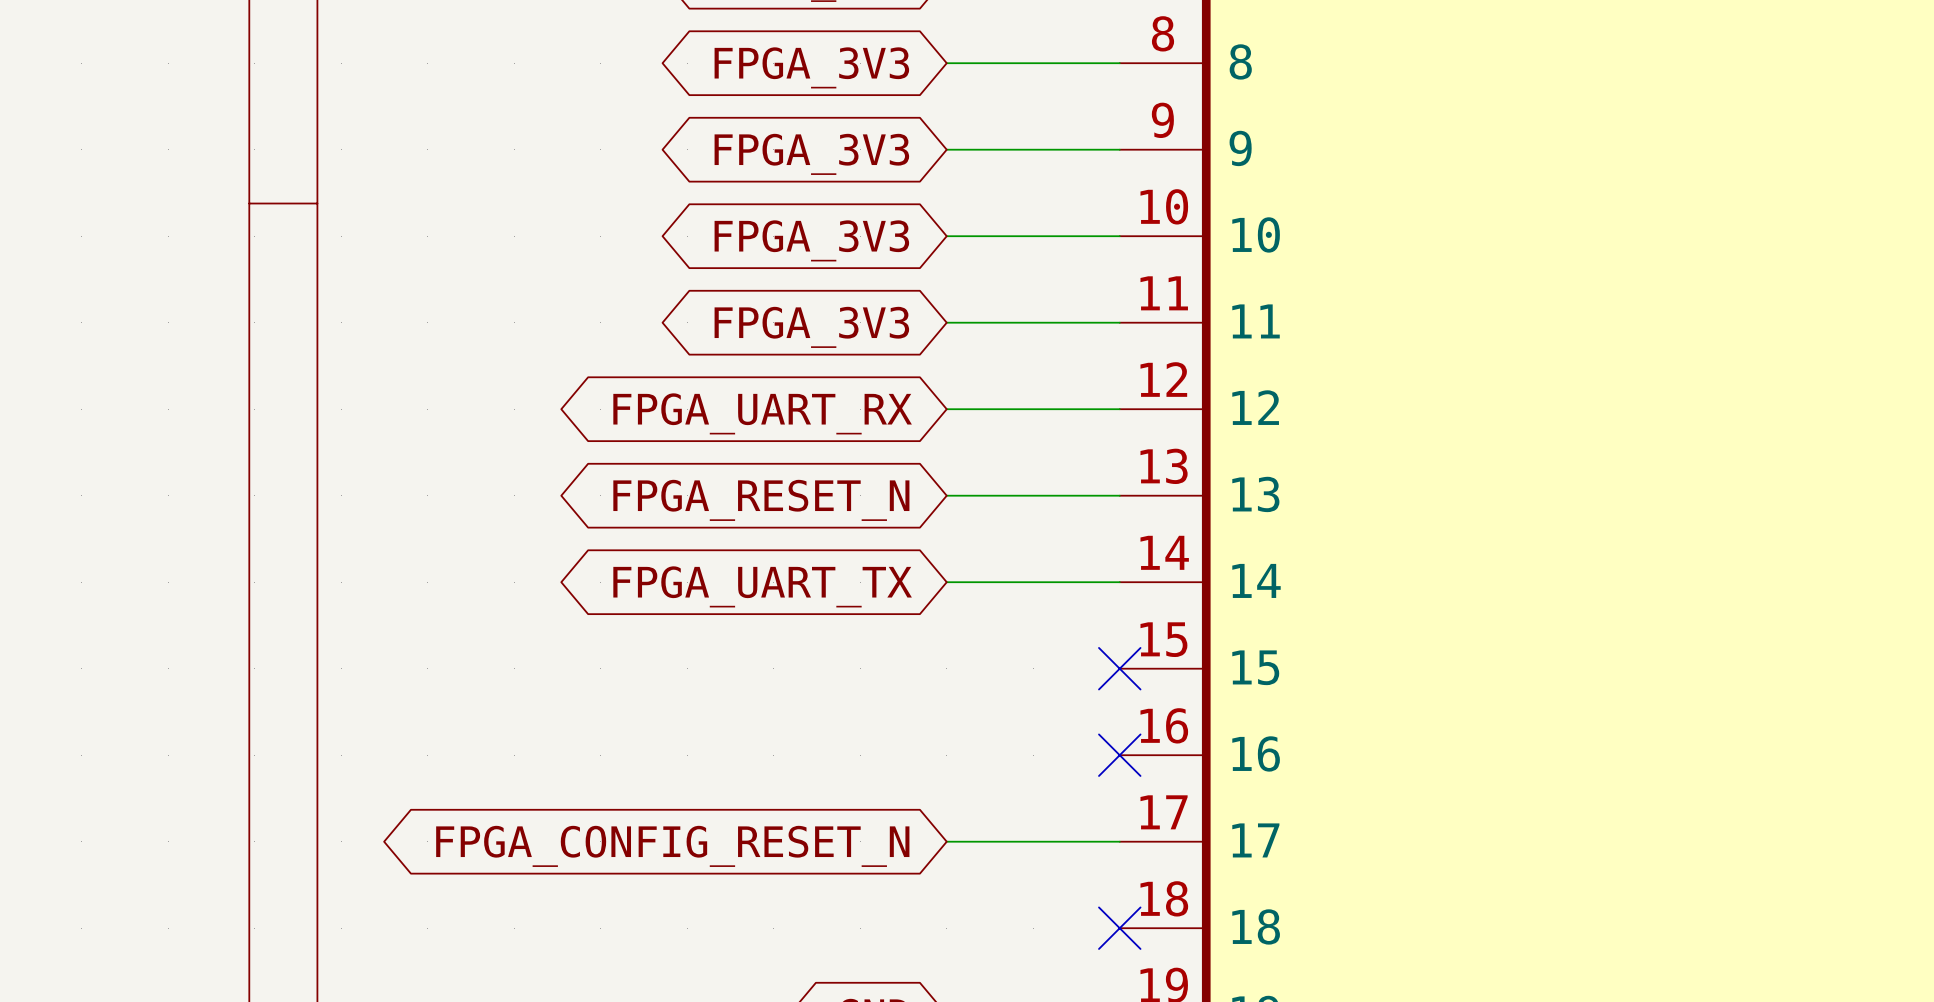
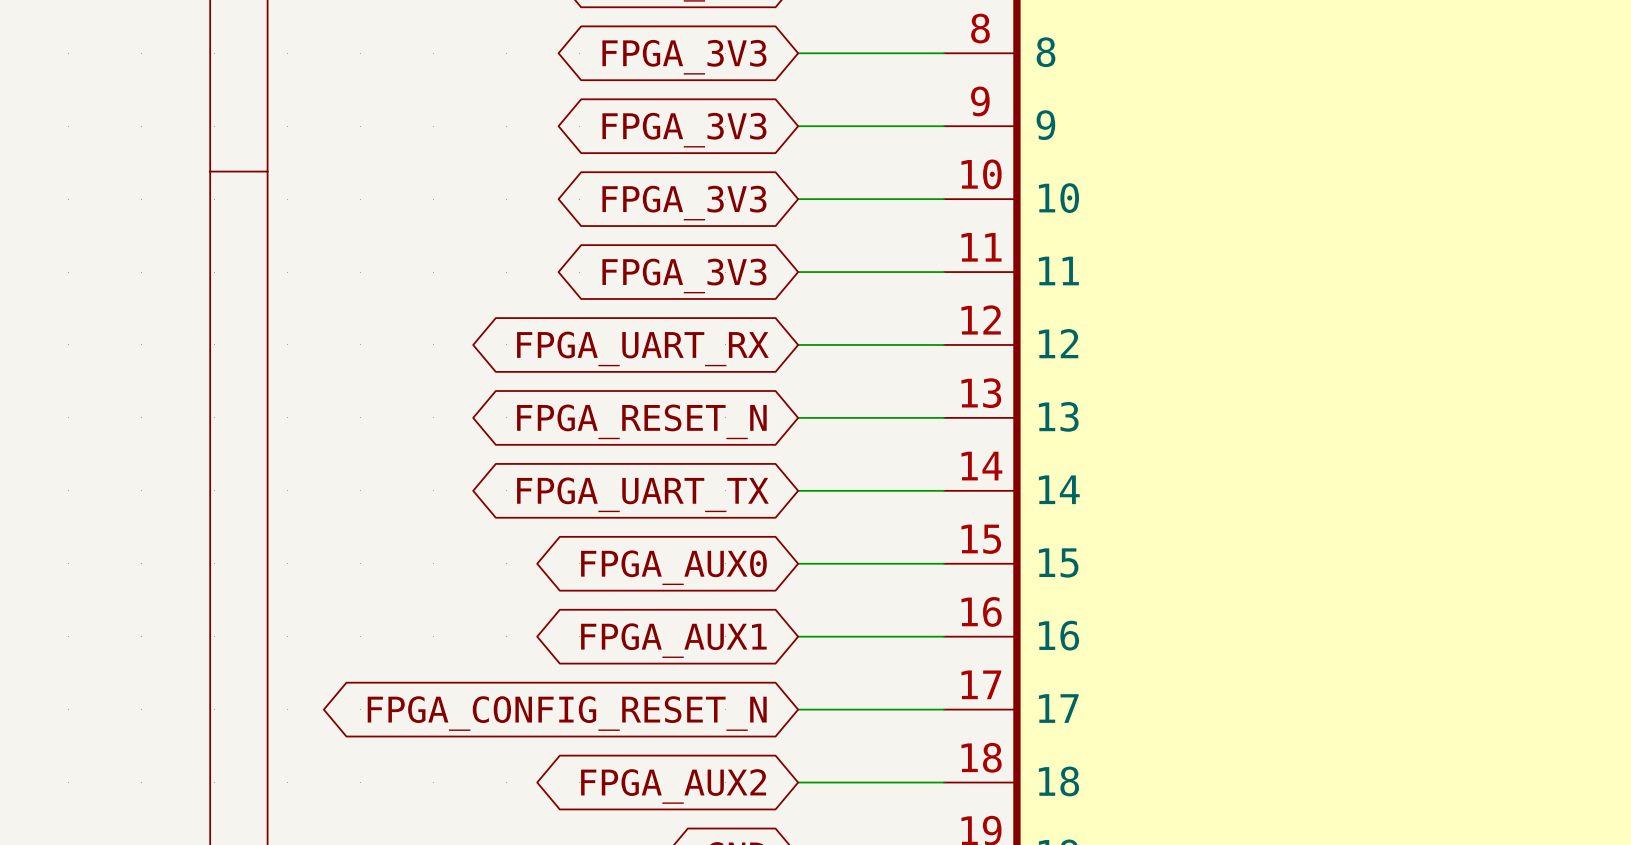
wire: none -> (798, 563) (944, 563)
no-connect mark: (1119, 668) -> none
global label: none -> FPGA_AUX0 (673, 567)
wire: none -> (798, 636) (944, 636)
no-connect mark: (1119, 755) -> none
global label: none -> FPGA_AUX1 (673, 640)
wire: none -> (798, 782) (944, 782)
no-connect mark: (1119, 928) -> none
global label: none -> FPGA_AUX2 (673, 786)

